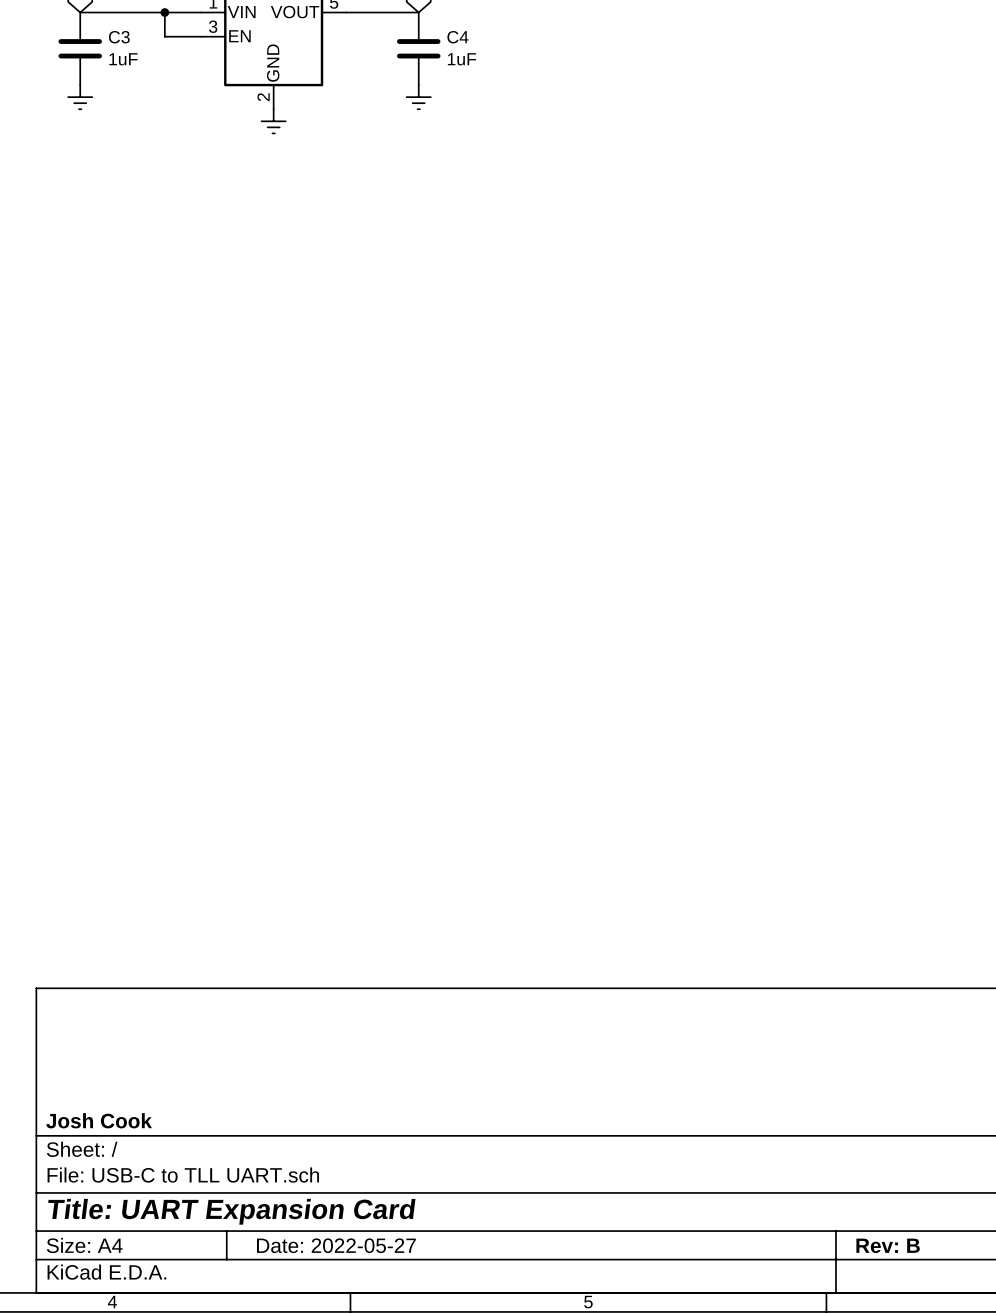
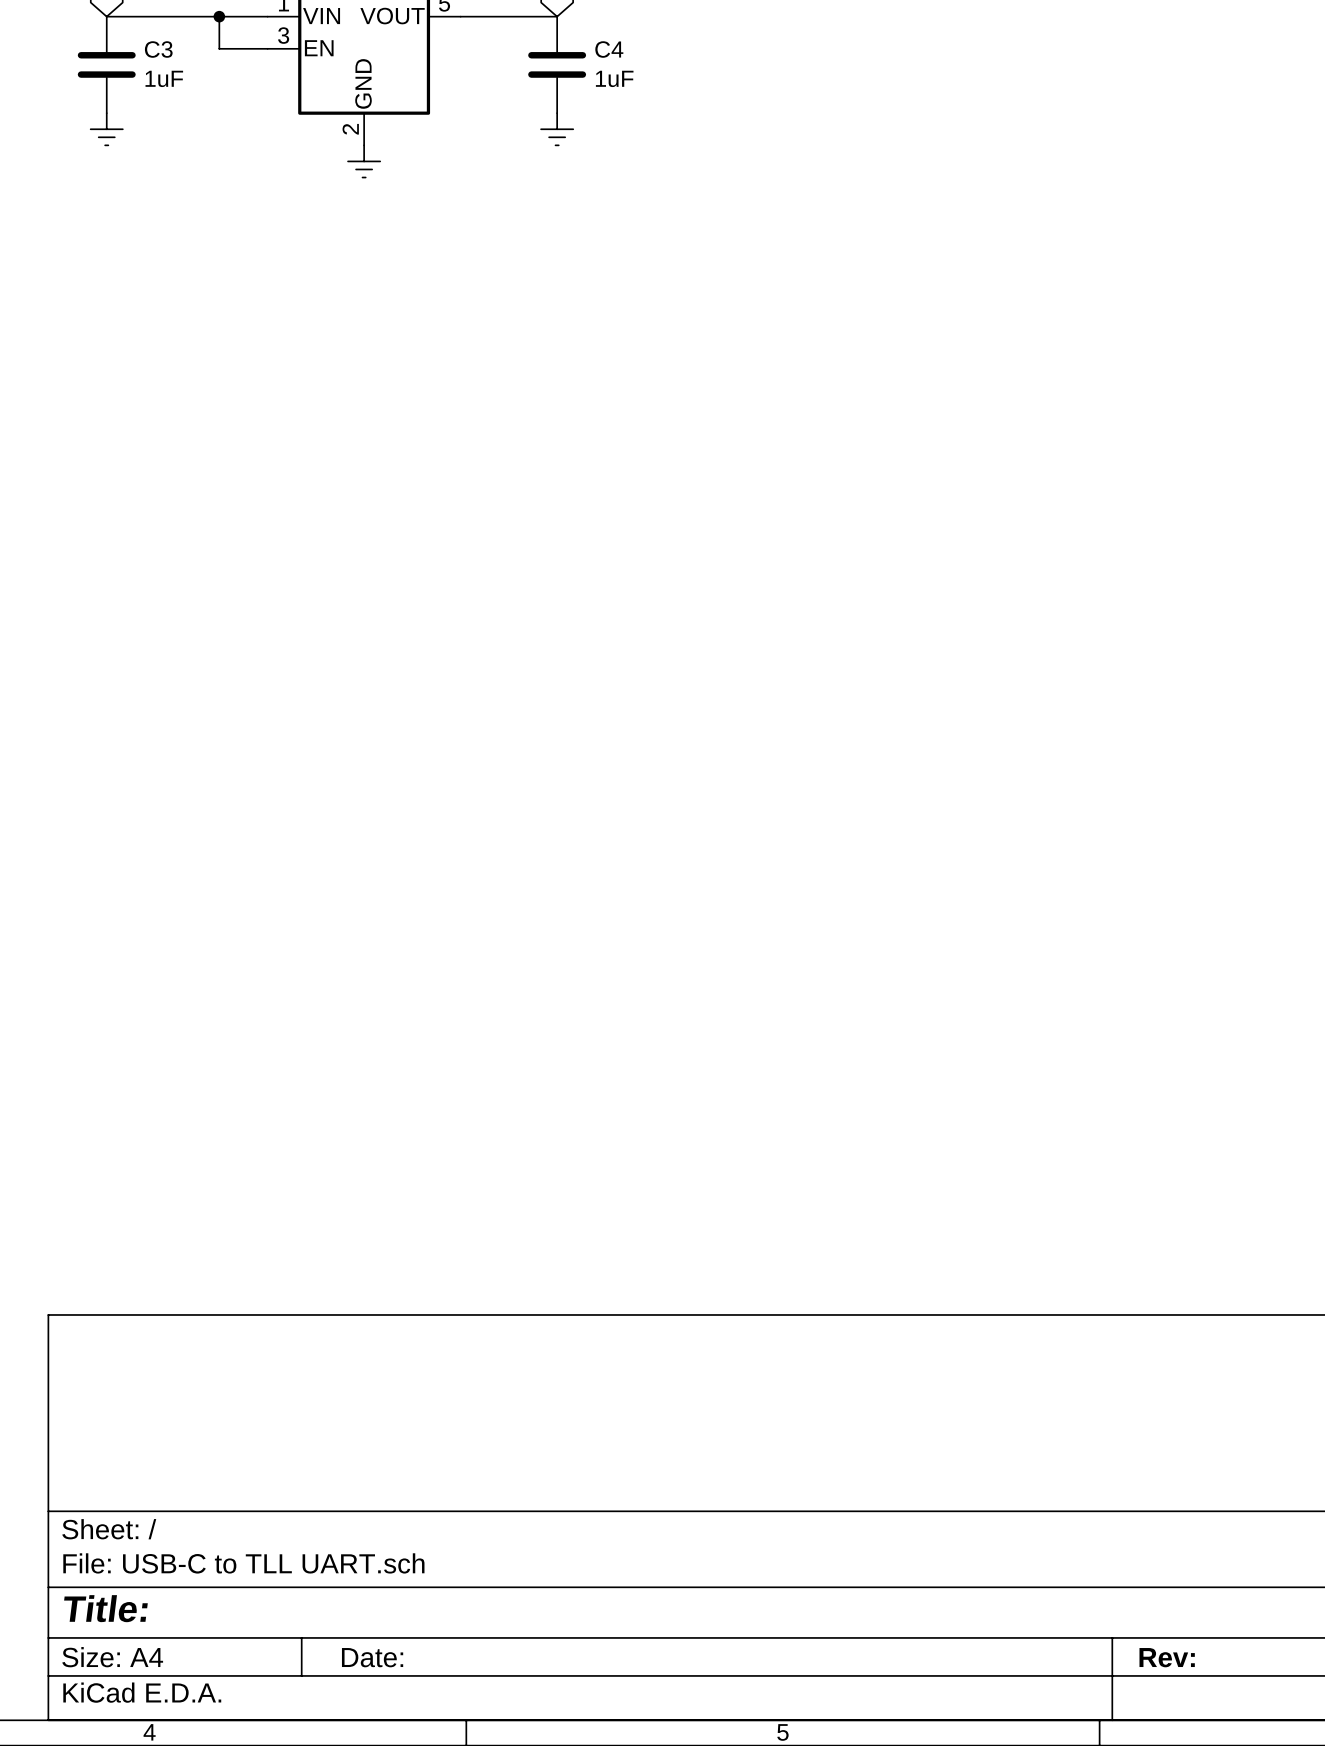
title block: Josh Cook (99, 1120) -> none
title block: Title: UART Expansion Card (231, 1211) -> Title: (105, 1608)
title block: Date: 2022-05-27 (336, 1245) -> Date: (372, 1657)
title block: Rev: B (888, 1245) -> Rev: (1167, 1657)

